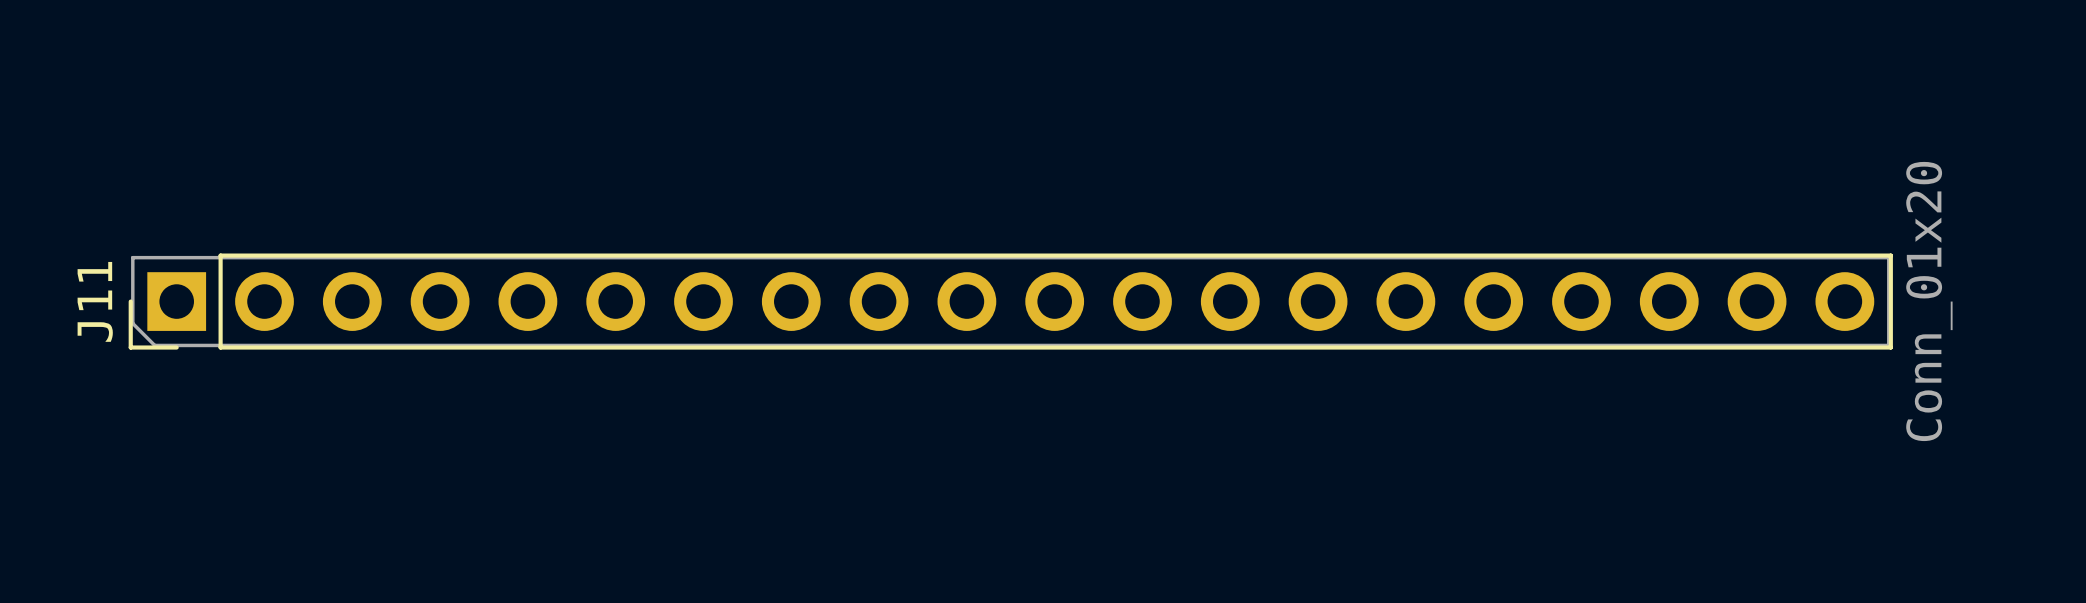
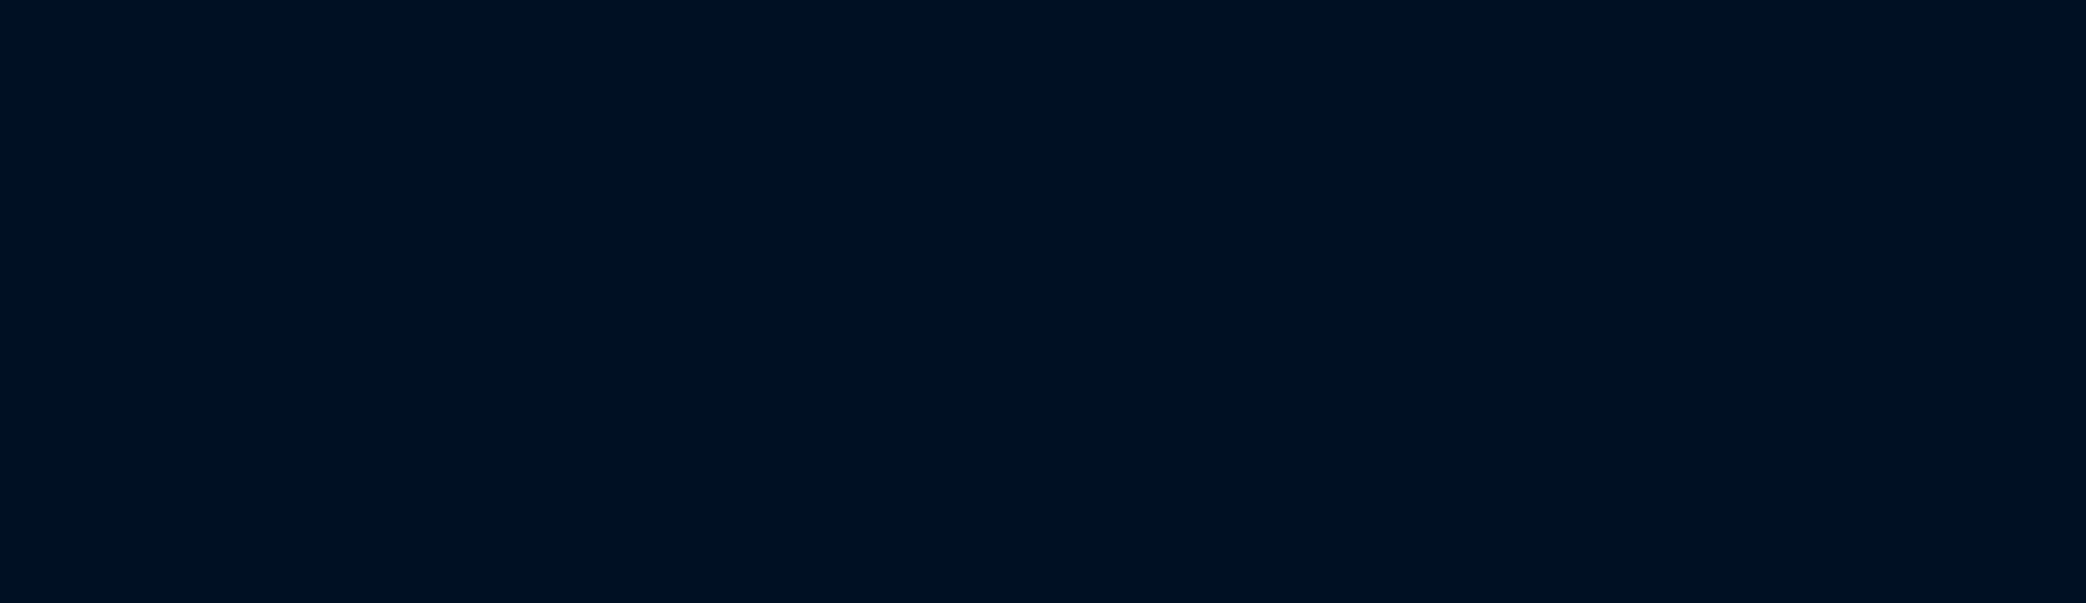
J11: Conn_01x20 (1010, 301) -> none

